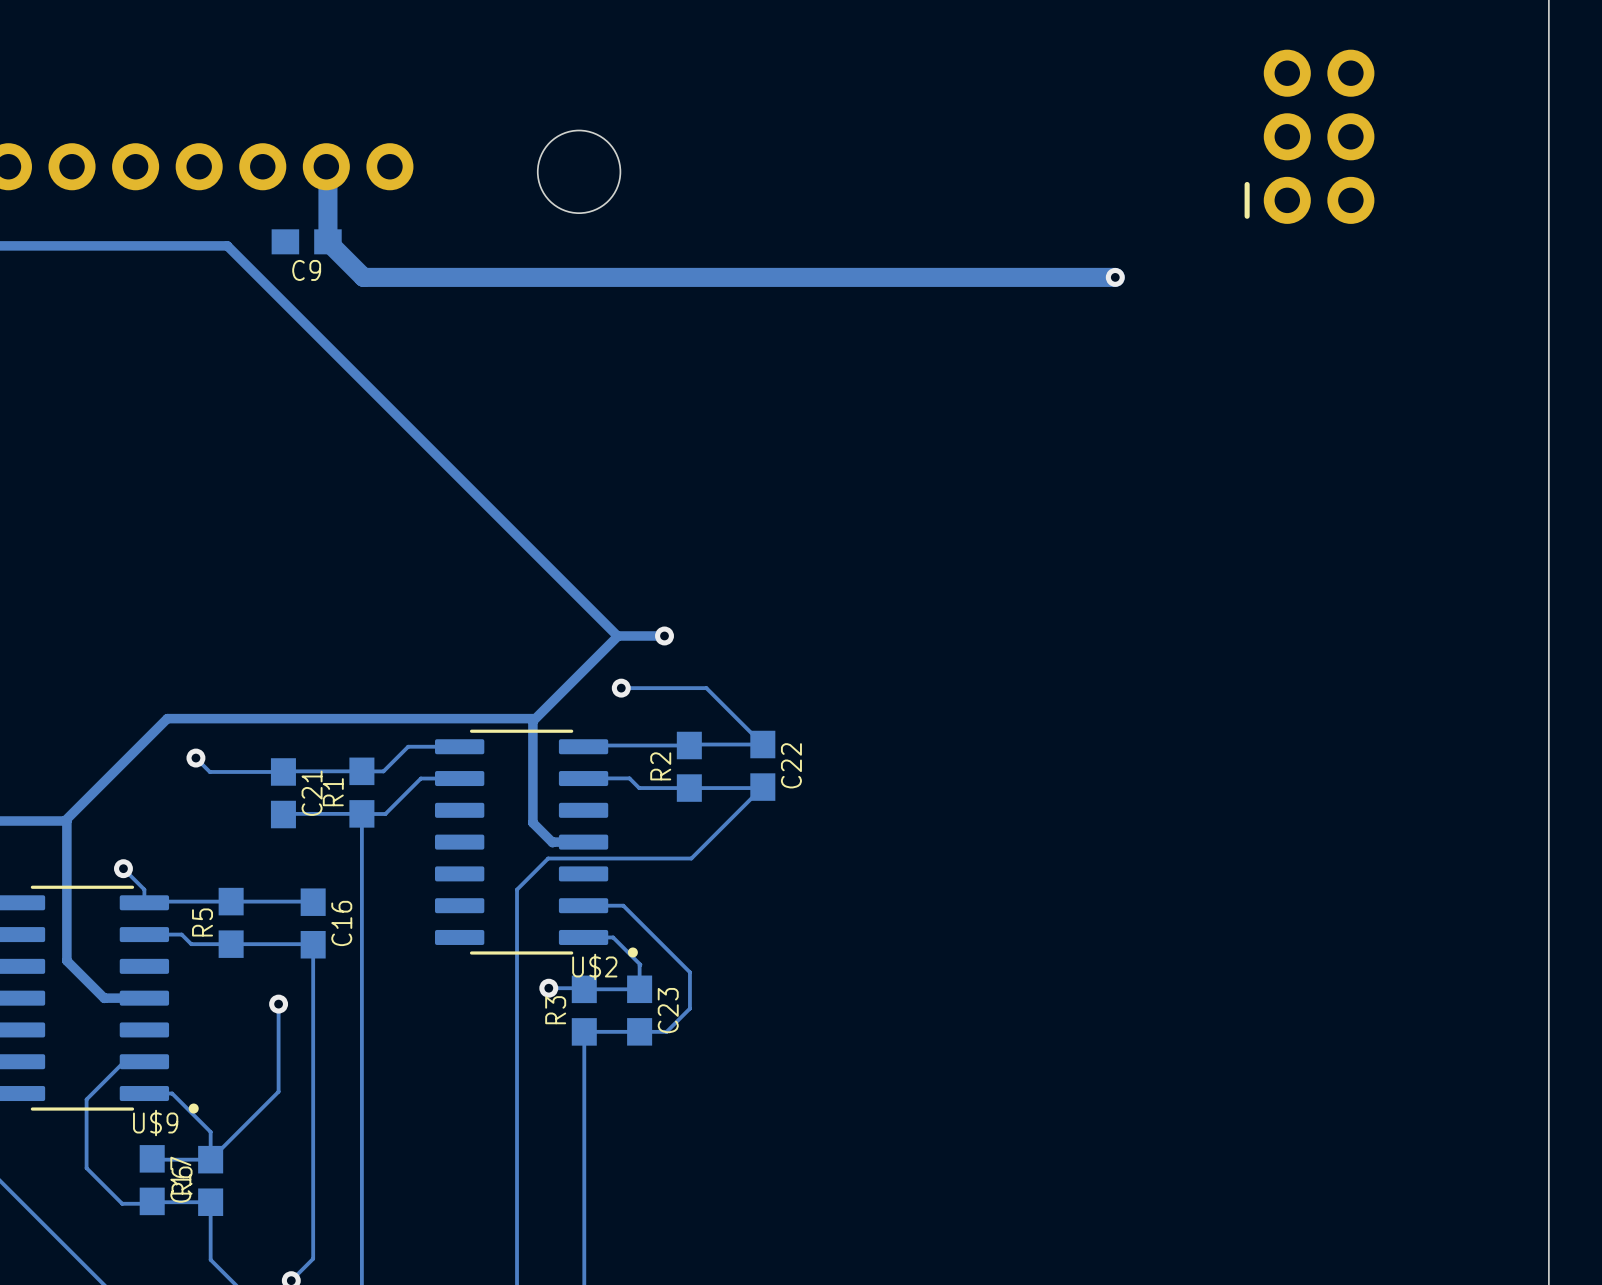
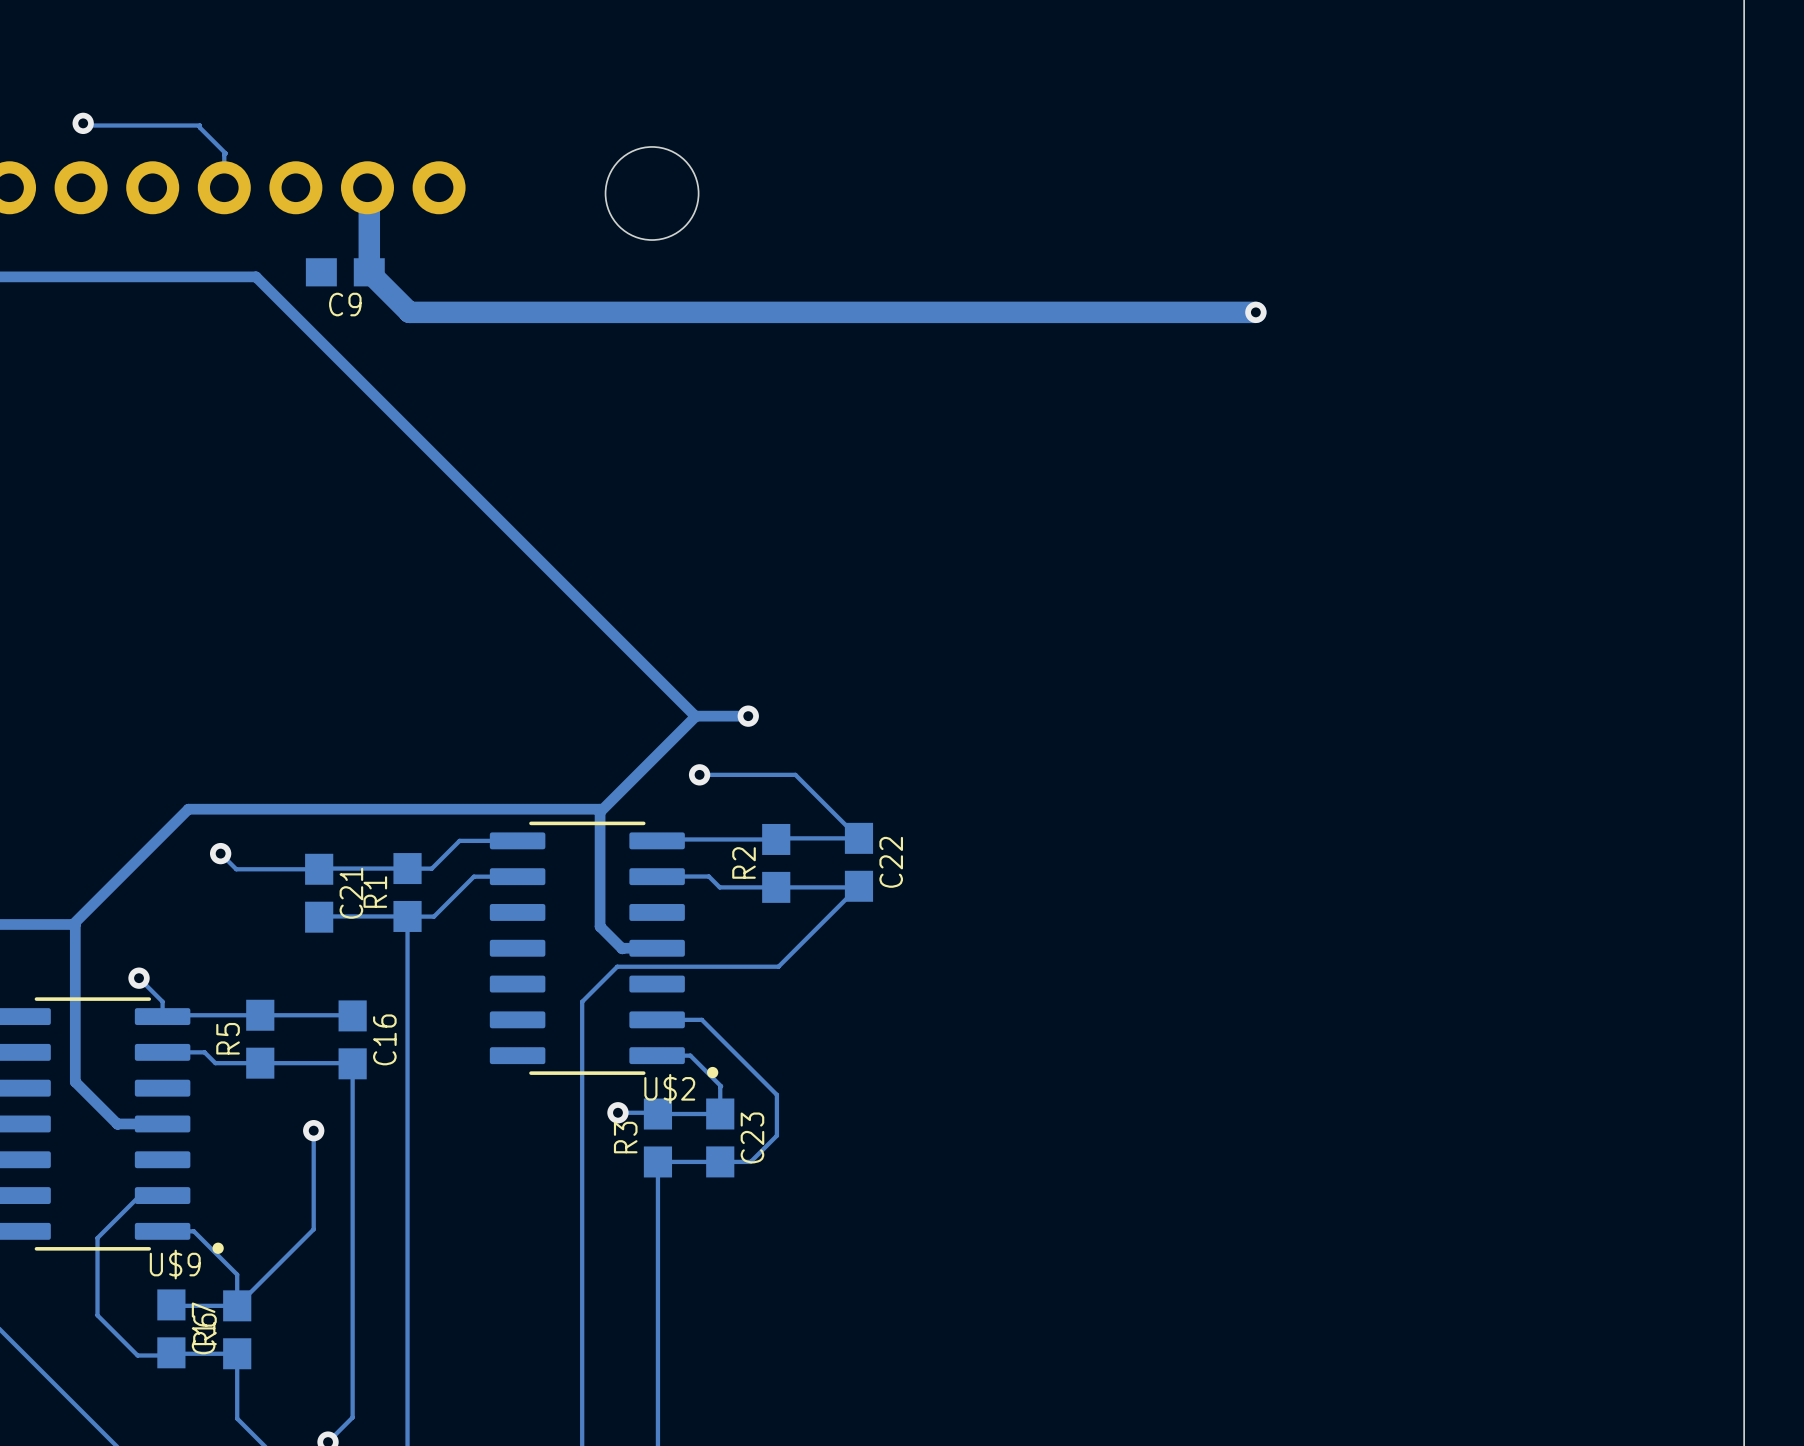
track: none -> (83, 123) (85, 125) (199, 125) (225, 153) (224, 187)
via: none -> (83, 123)
part: (1309, 136) -> none

